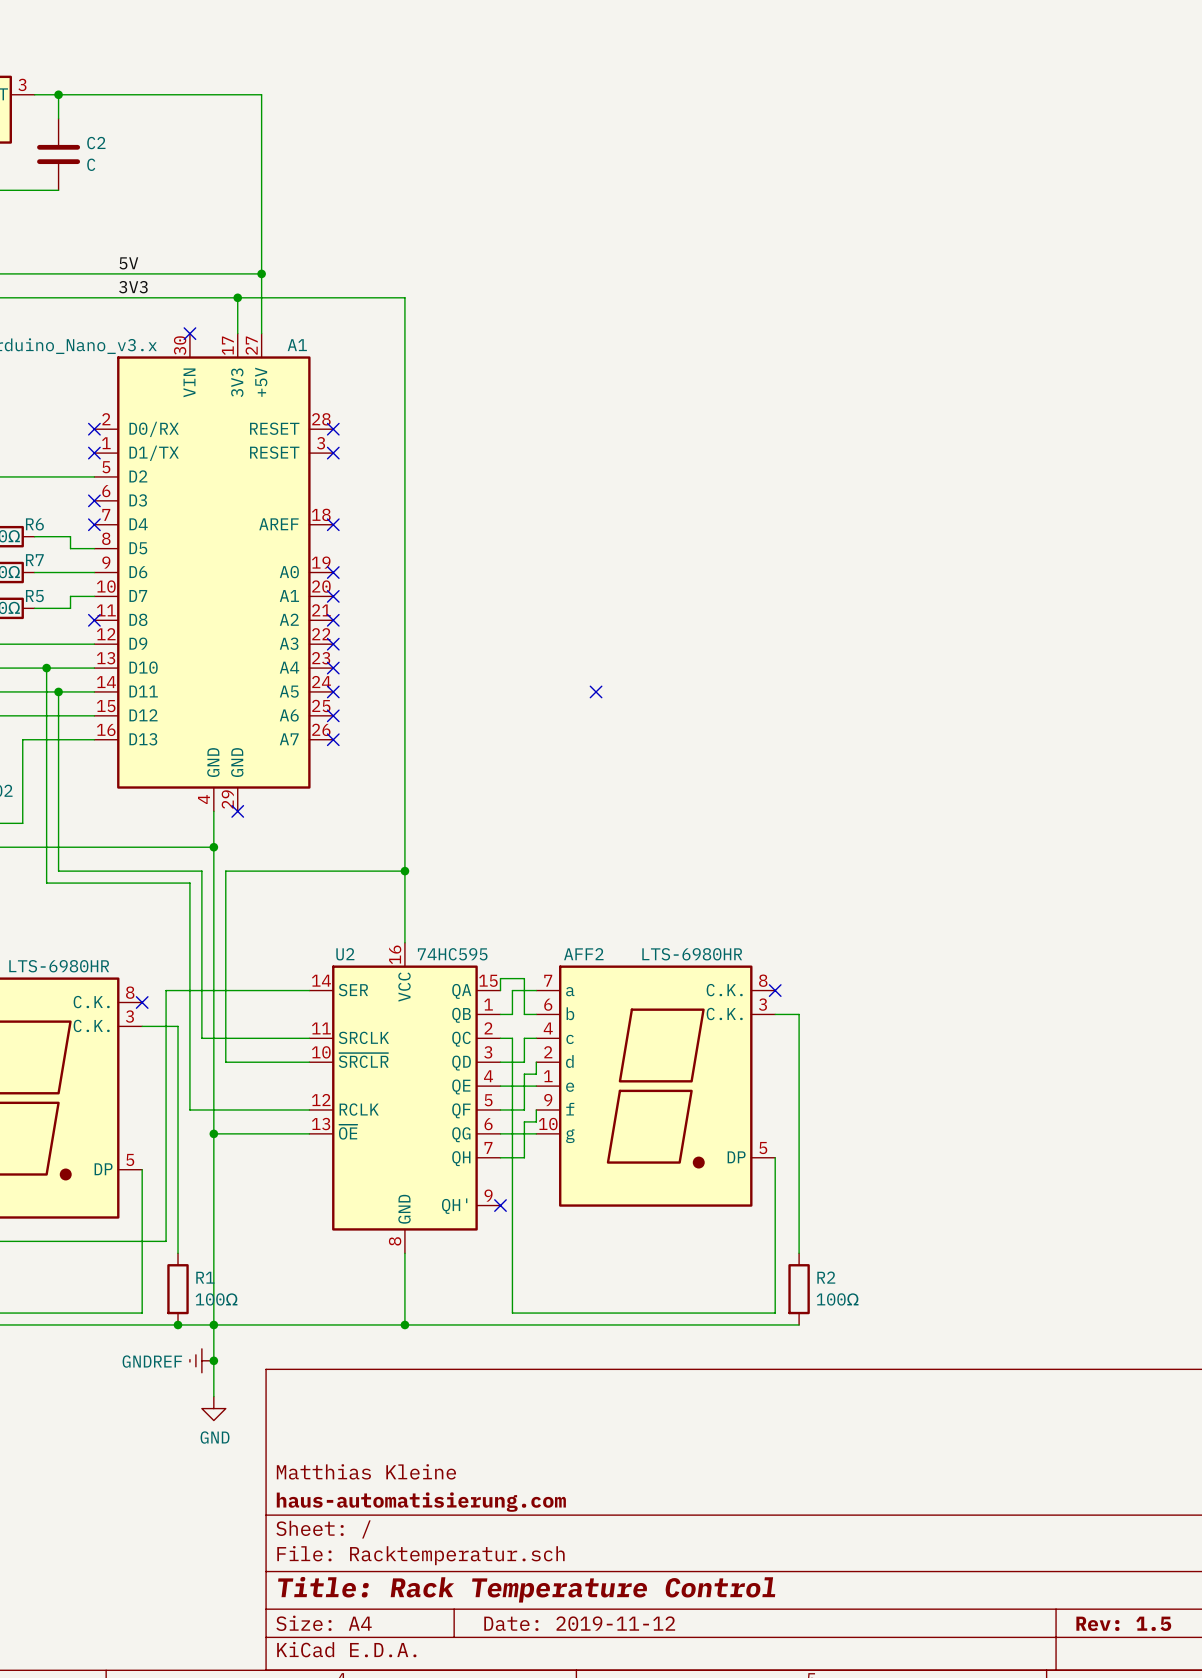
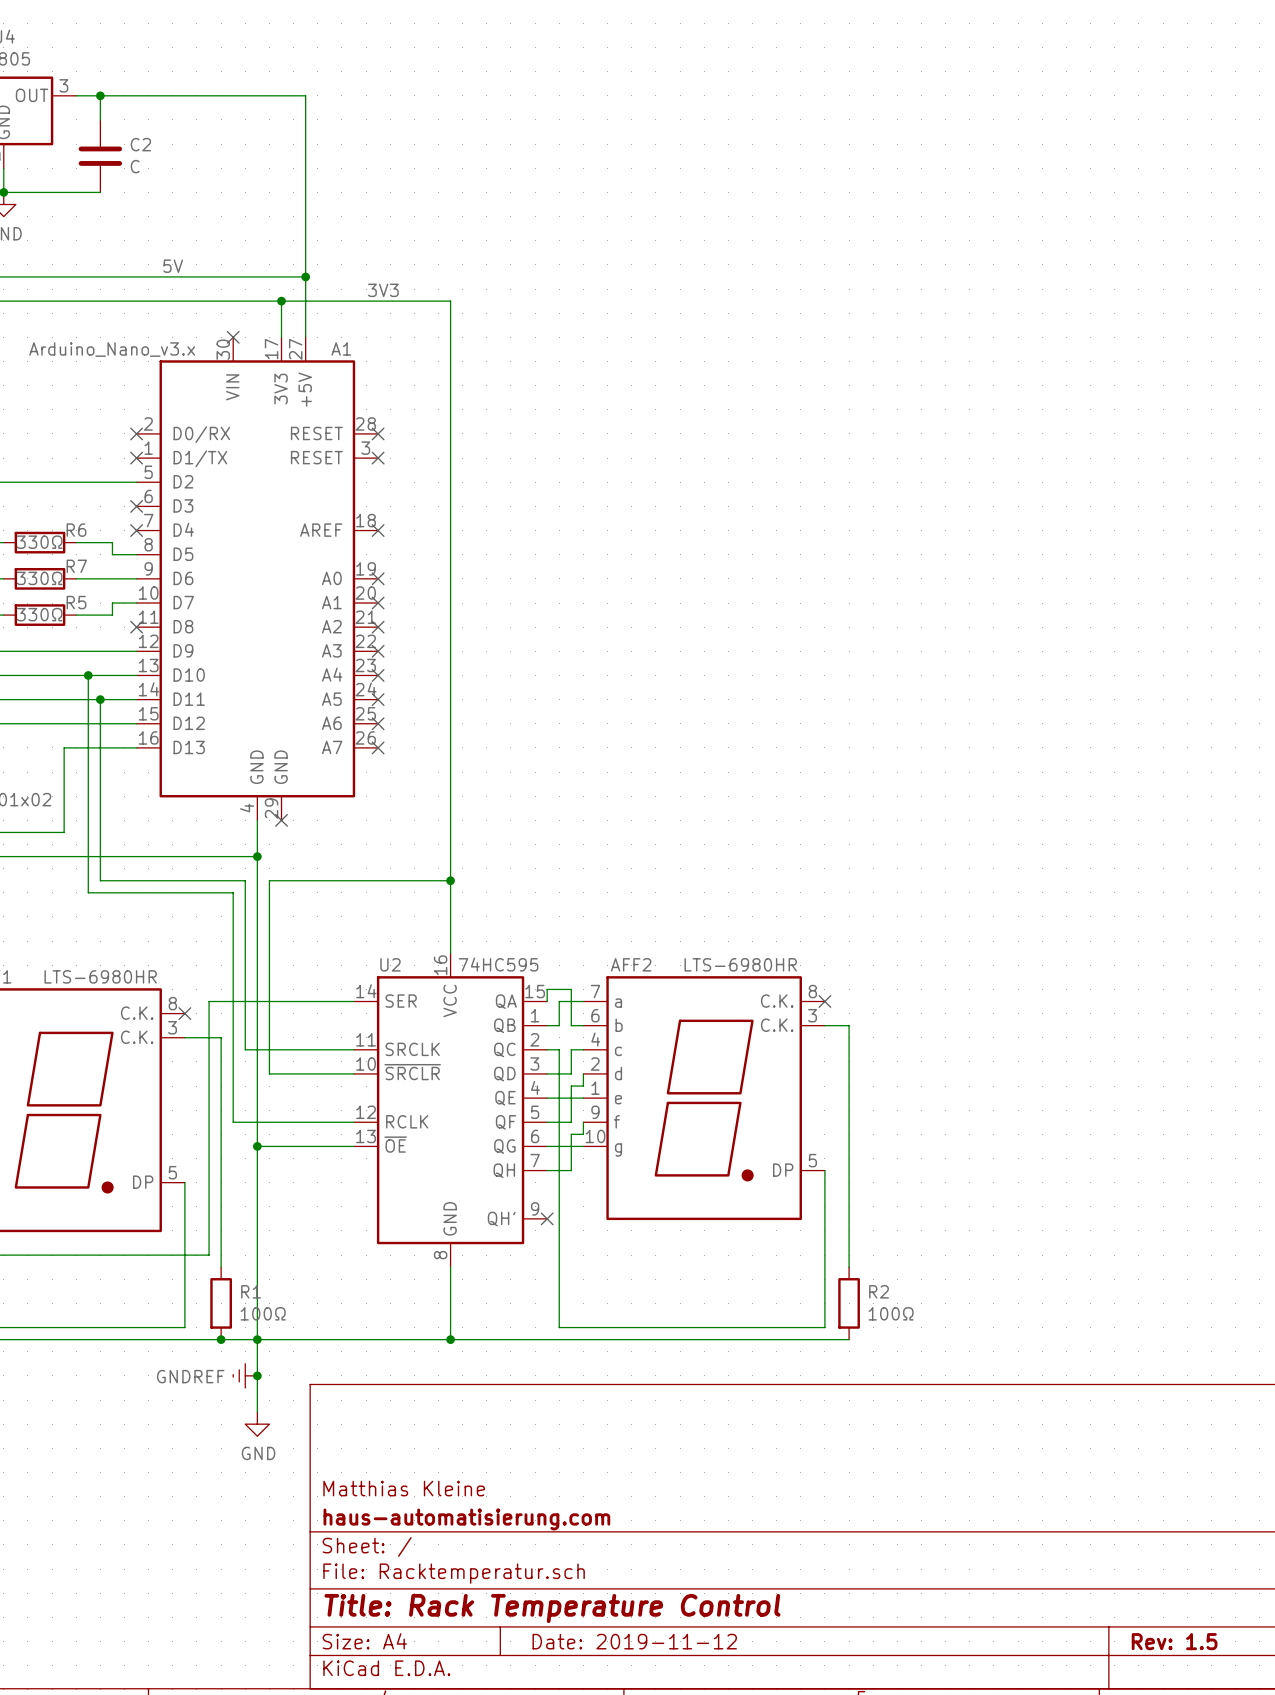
label position: 3V3 (133, 287) -> 3V3 (383, 290)
no-connect mark: (596, 691) -> none

